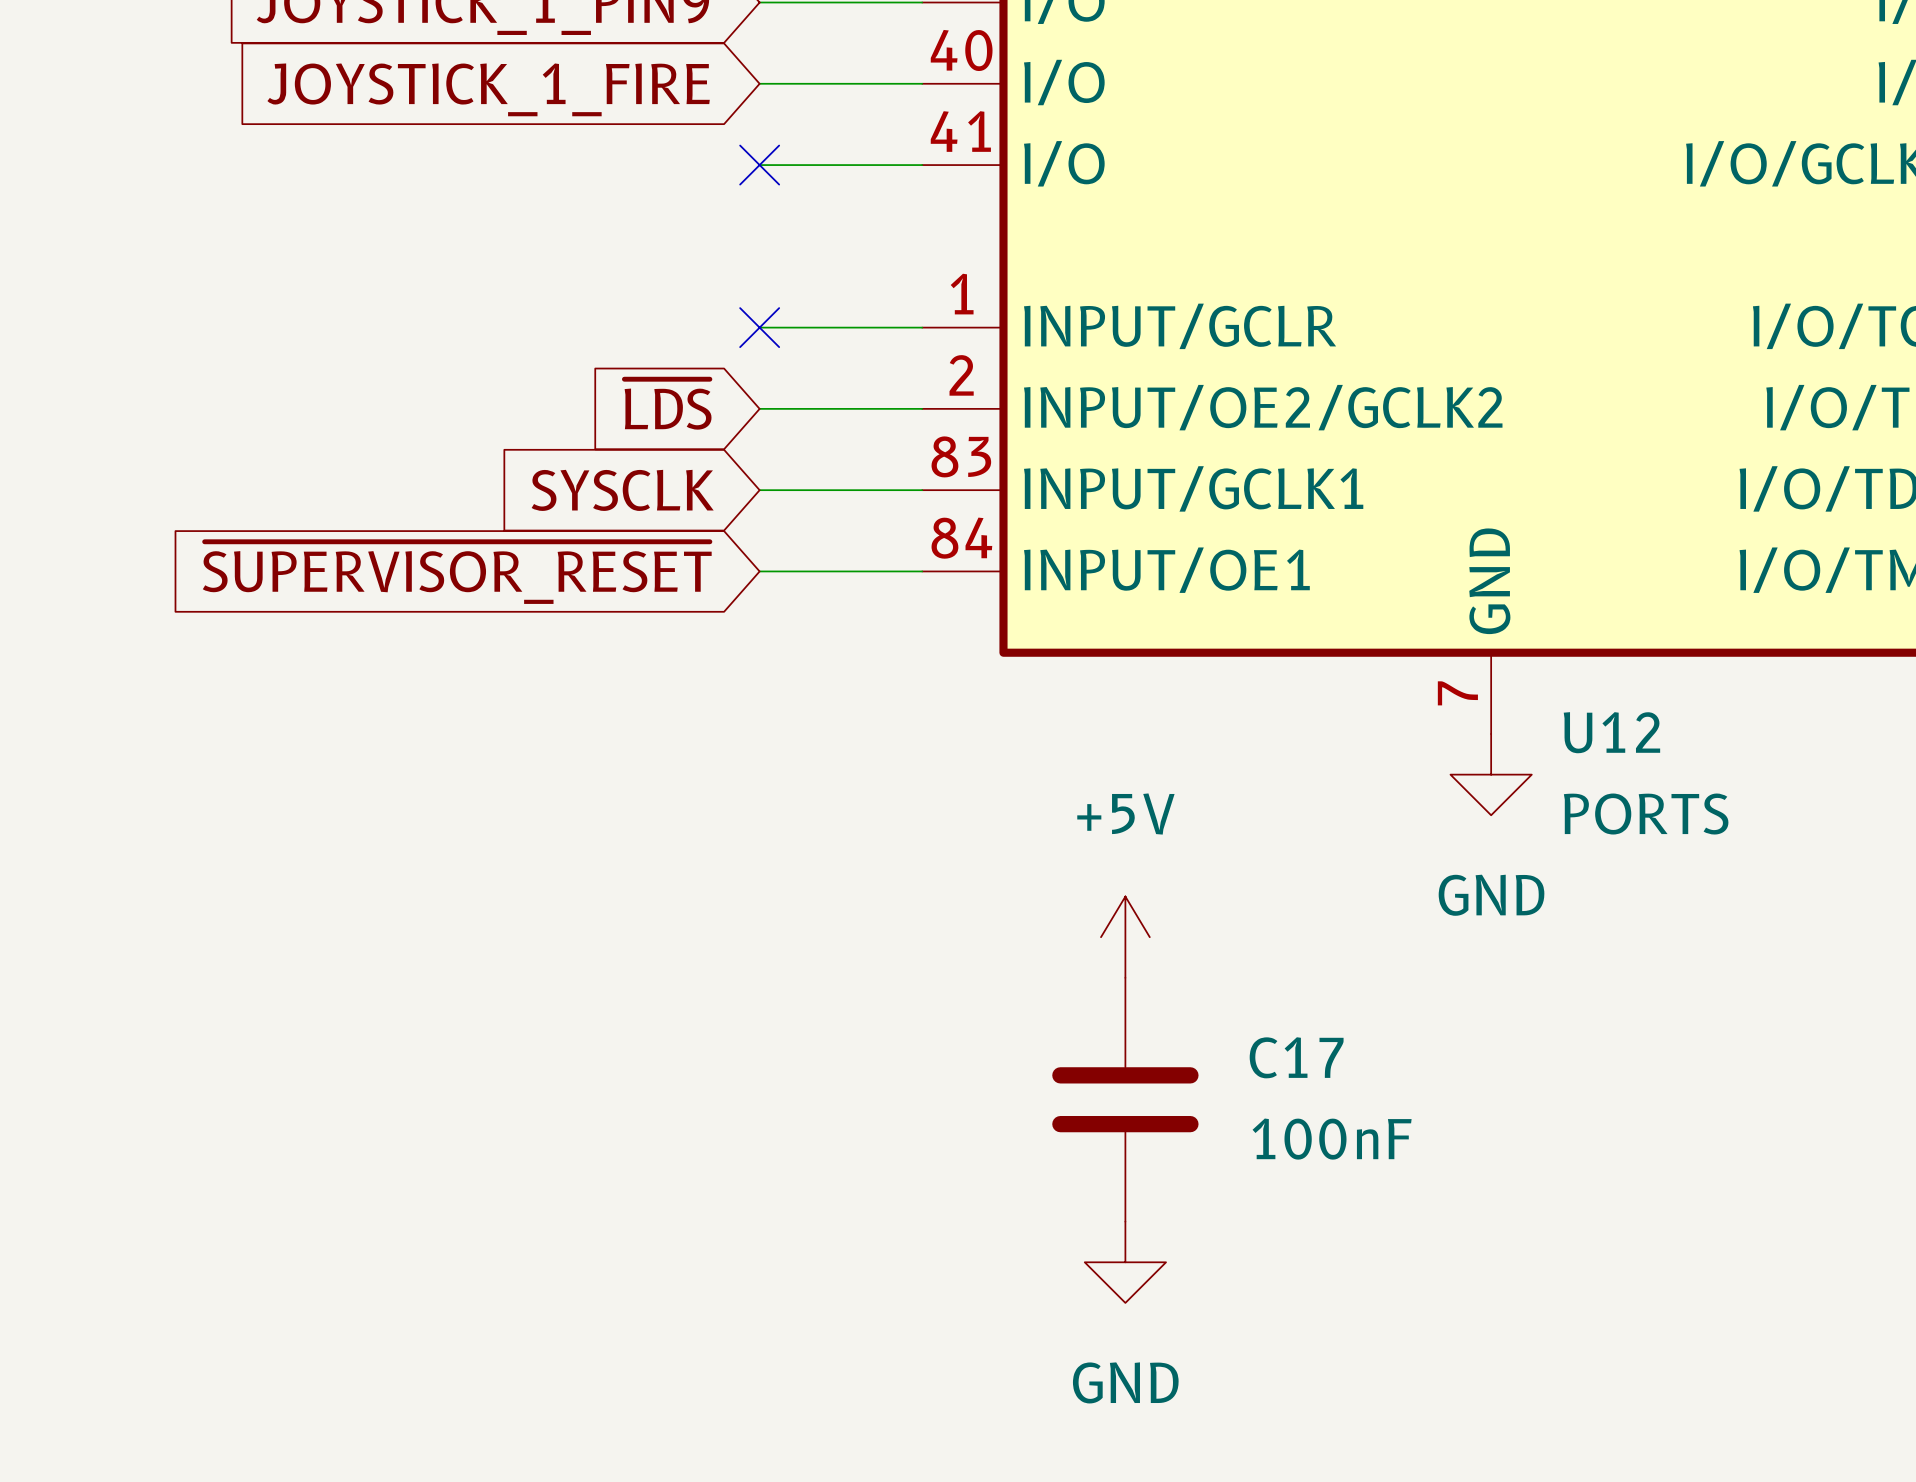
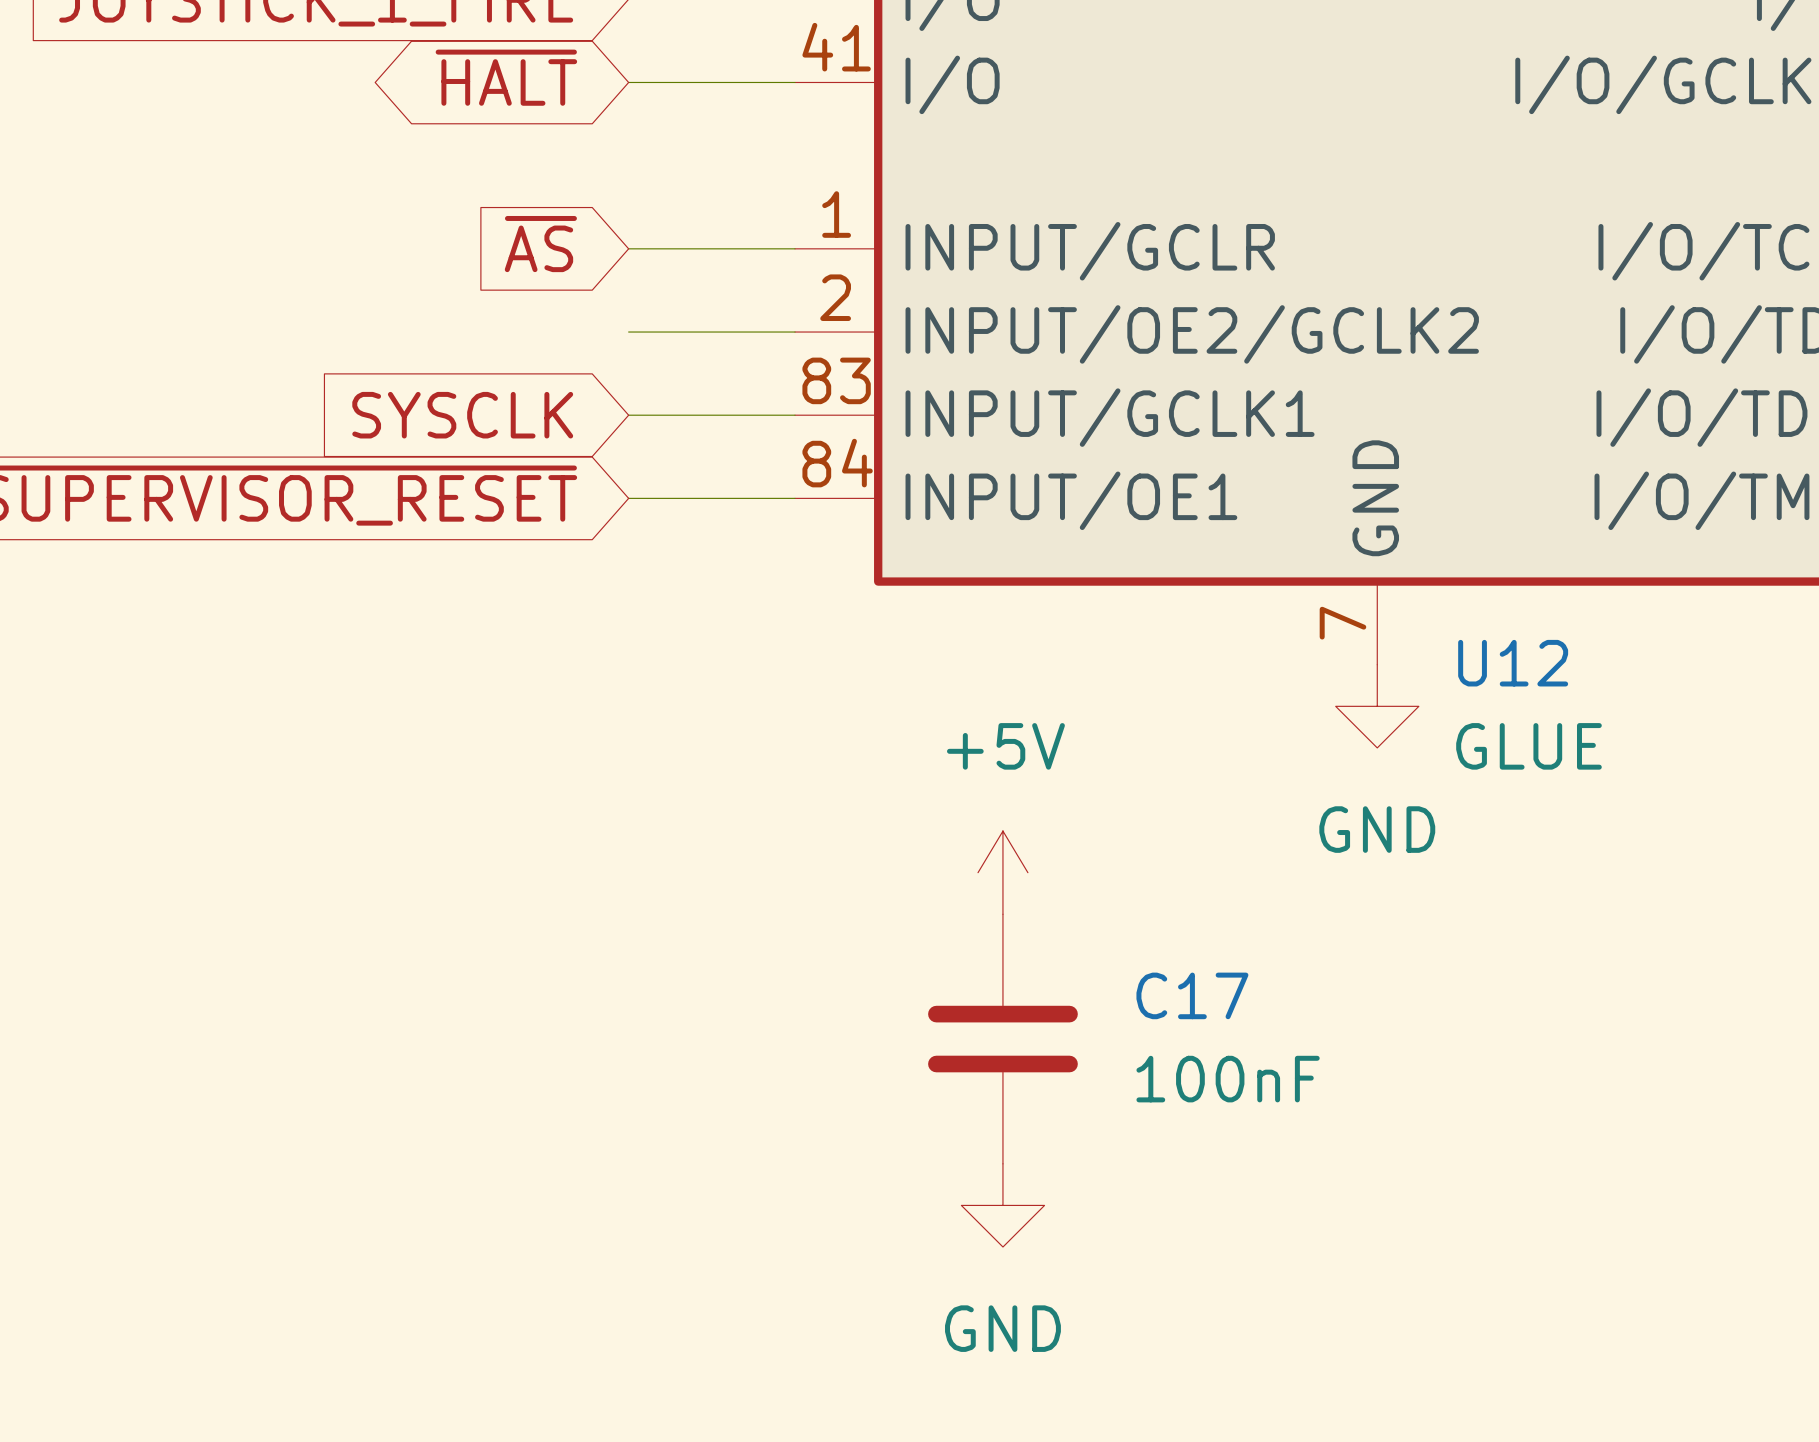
global label: none -> ~{HALT} (506, 77)
no-connect mark: (759, 165) -> none
no-connect mark: (759, 327) -> none
global label: ~{LDS} (667, 404) -> ~{AS} (540, 244)
U12 value: PORTS (1646, 814) -> GLUE (1528, 746)

